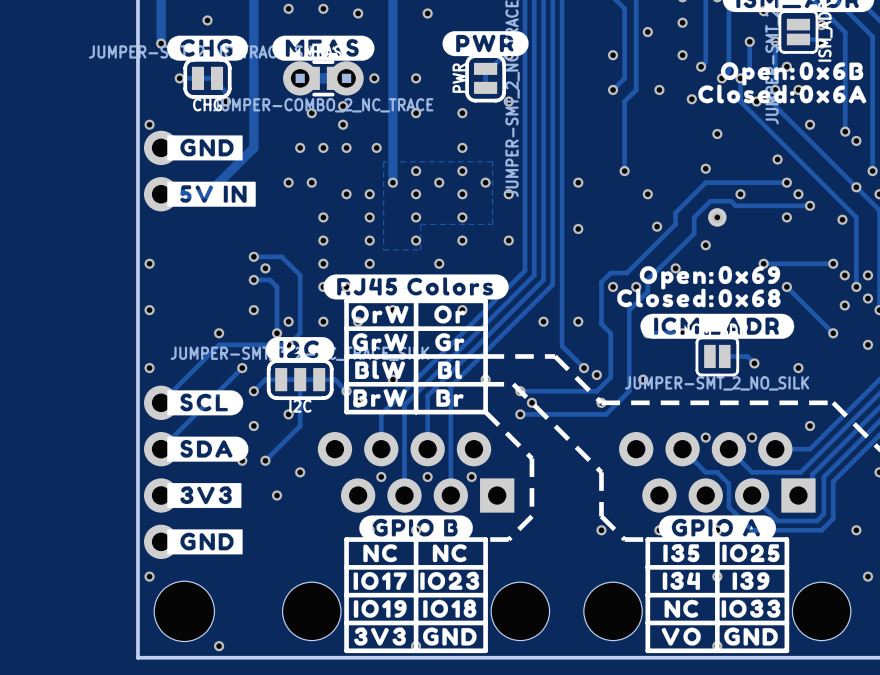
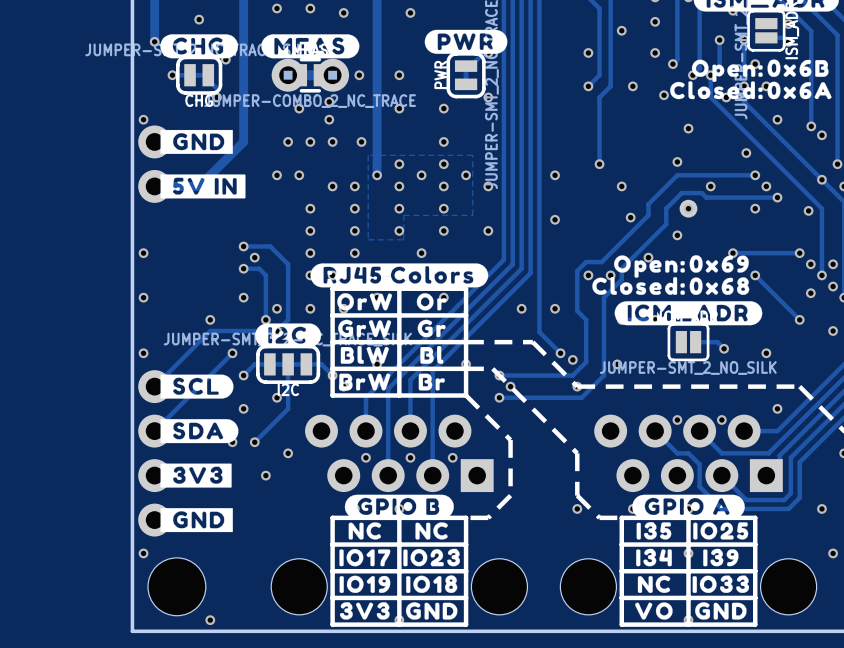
via: none -> (225, 59)

